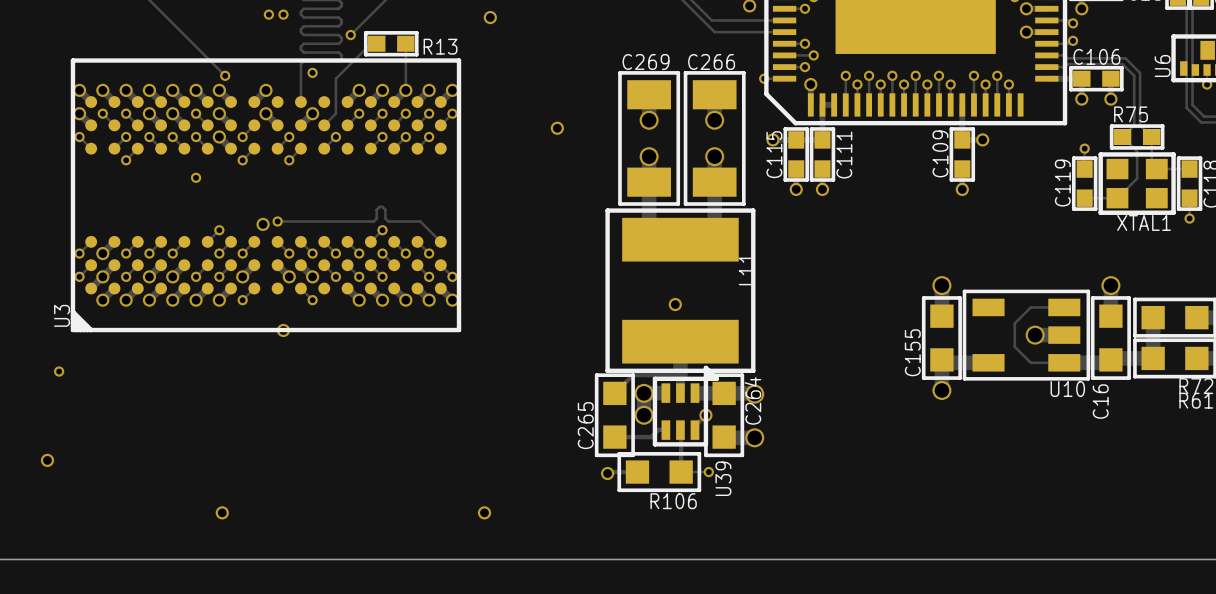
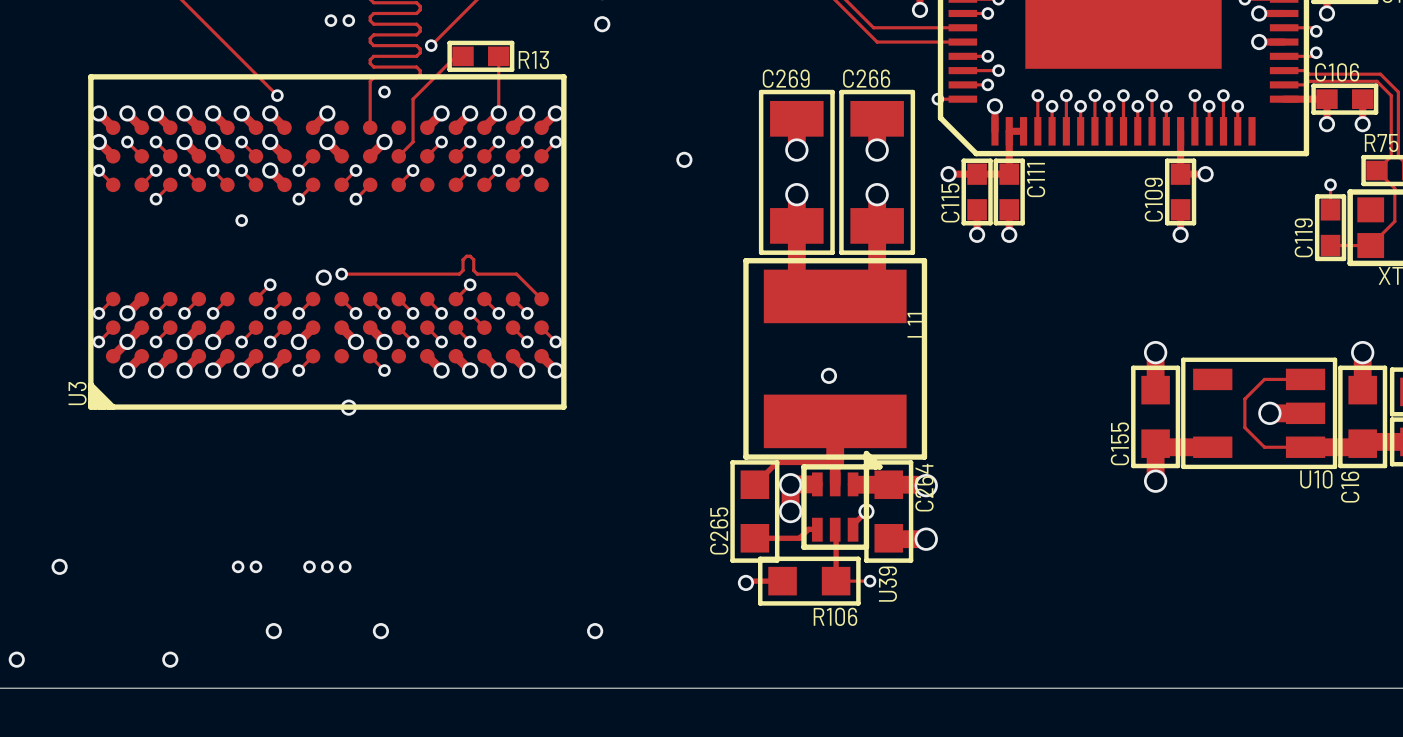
via: (59, 371) -> none
via: none -> (238, 566)
via: none -> (255, 566)
via: none -> (309, 566)
via: none -> (327, 566)
via: none -> (345, 566)
via: none -> (380, 631)
via: none -> (16, 659)
via: none -> (170, 659)

